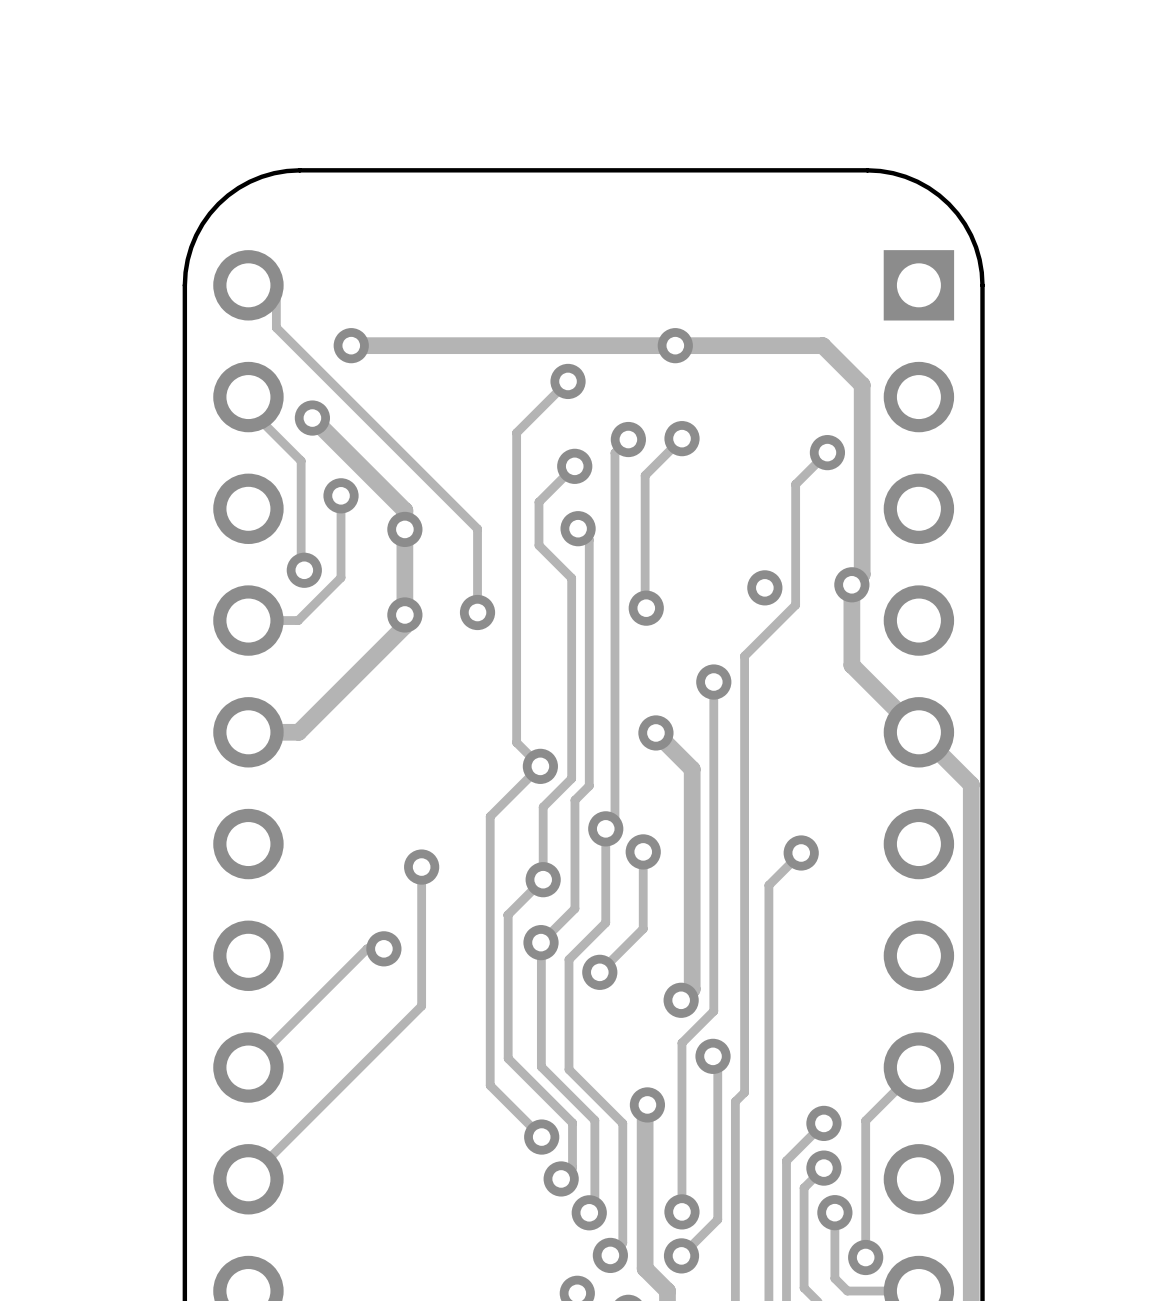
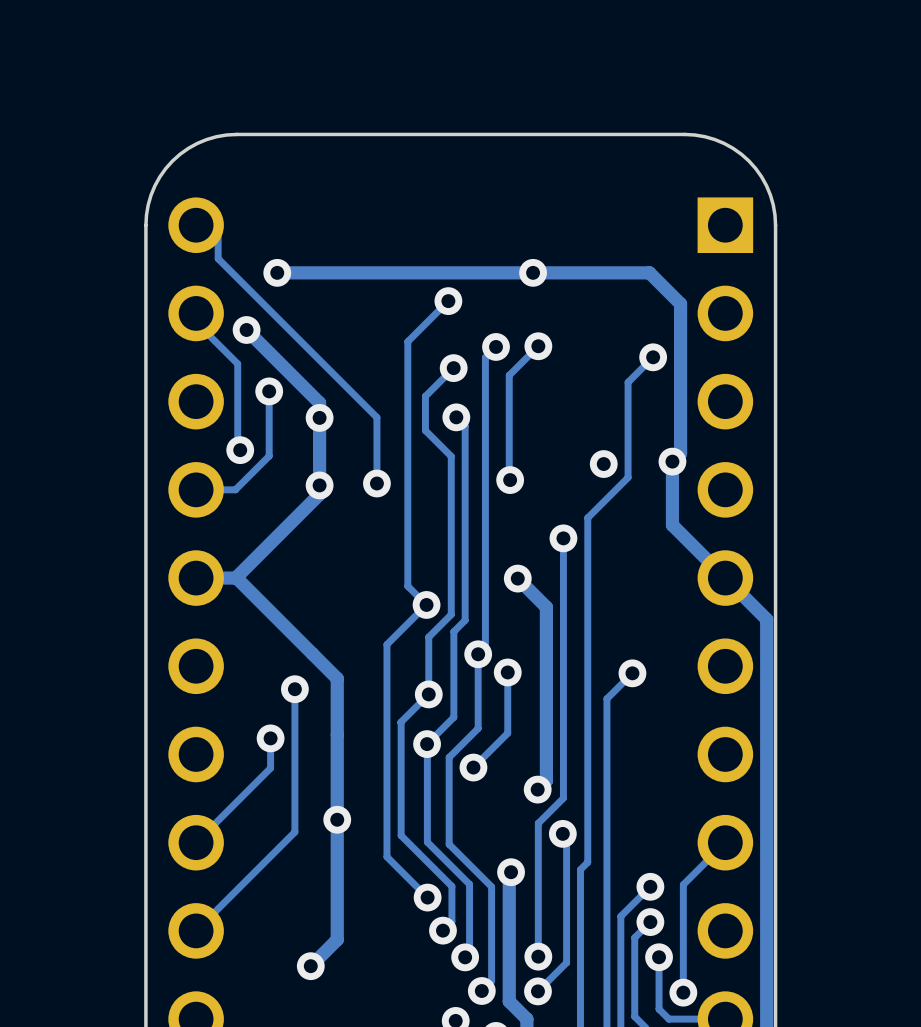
track: none -> (235, 578) (337, 678) (337, 939) (310, 966)
track: (421, 867) (421, 1006) (373, 1054) -> (294, 689) (294, 832)
via: (421, 867) -> none
via: none -> (294, 689)
via: none -> (270, 738)
track: (383, 948) (367, 948) (342, 973) -> (270, 738) (270, 768)
via: (383, 948) -> none
via: none -> (337, 819)
via: none -> (310, 966)

